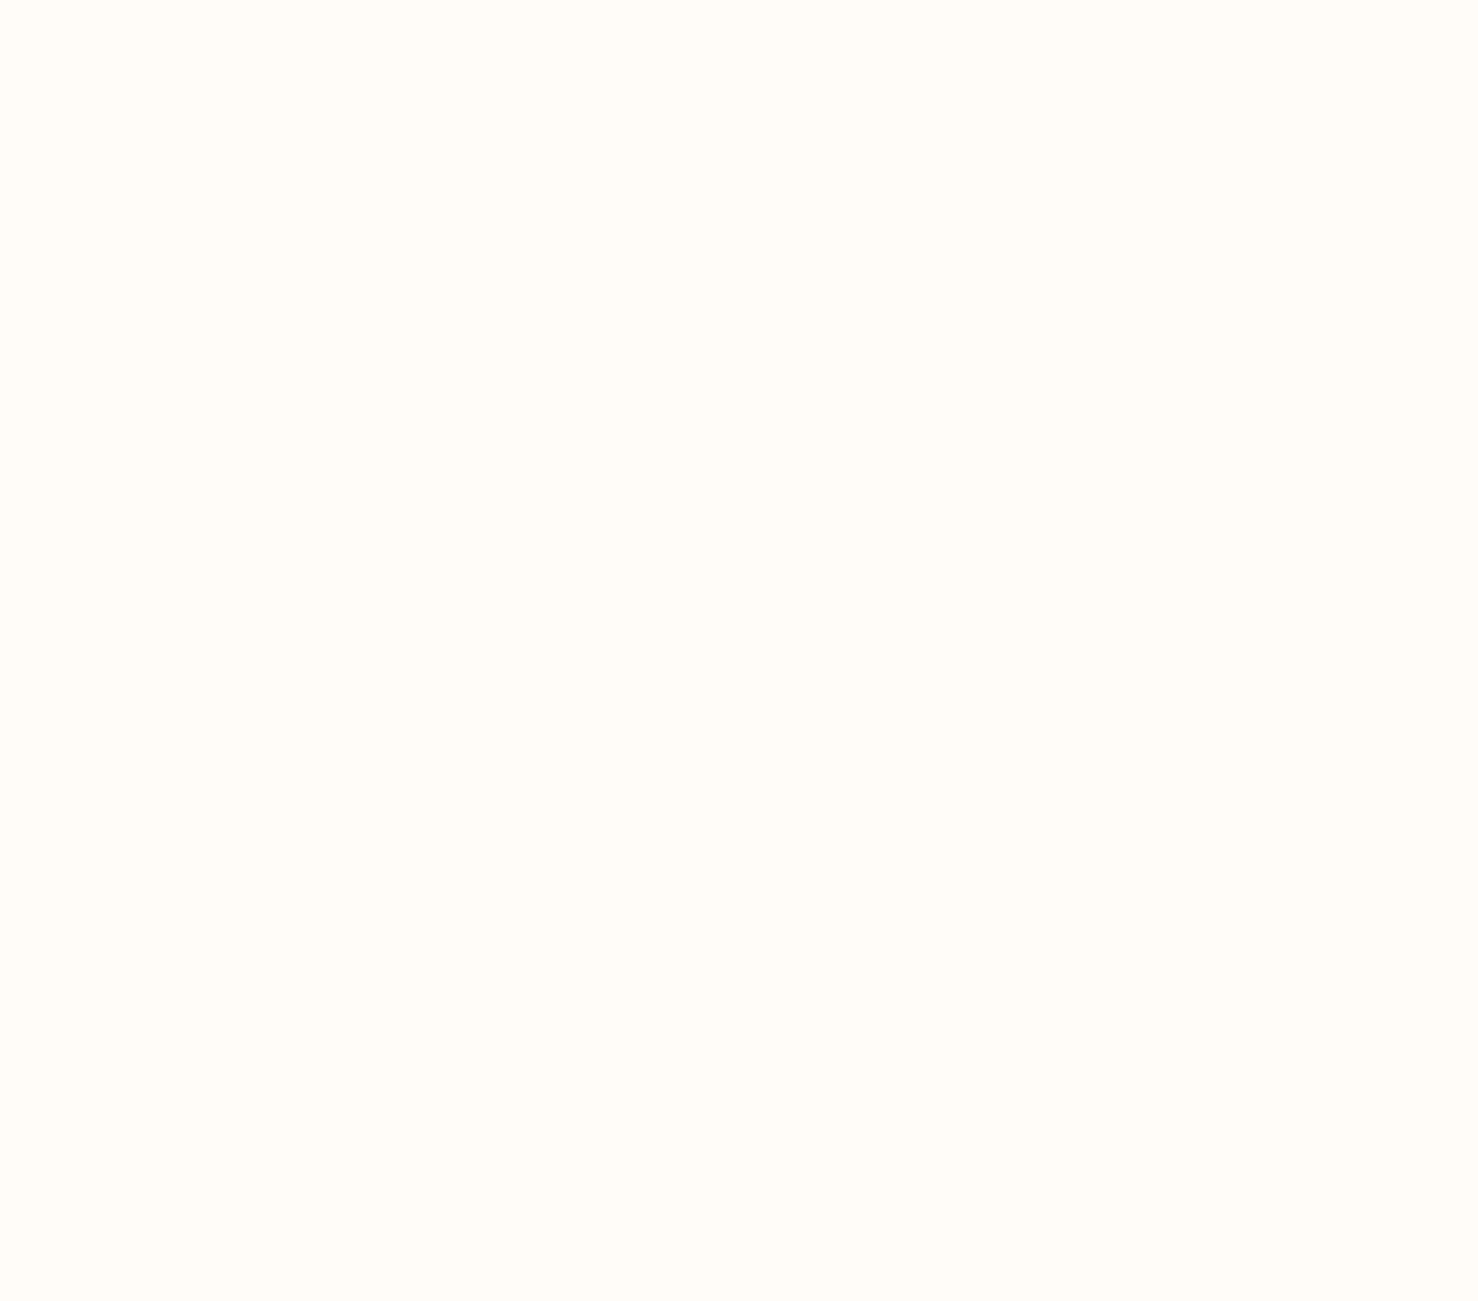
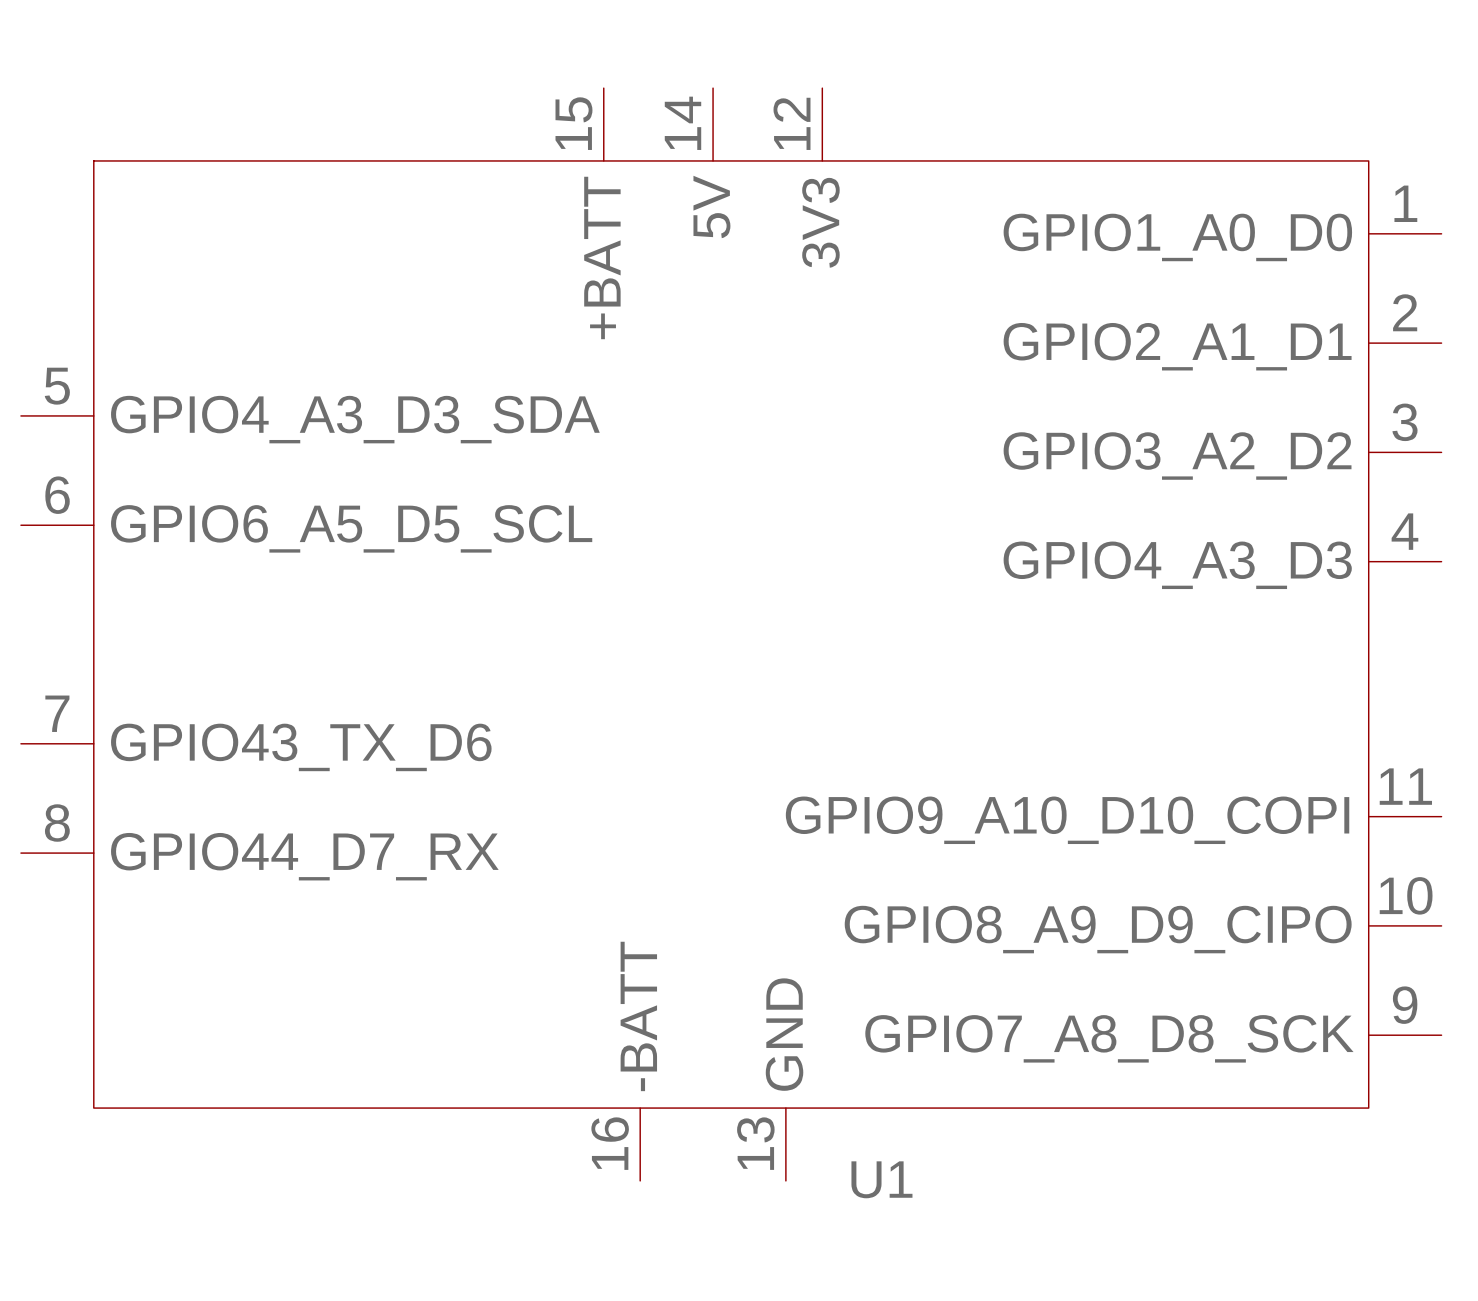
U1: none -> (731, 634)

